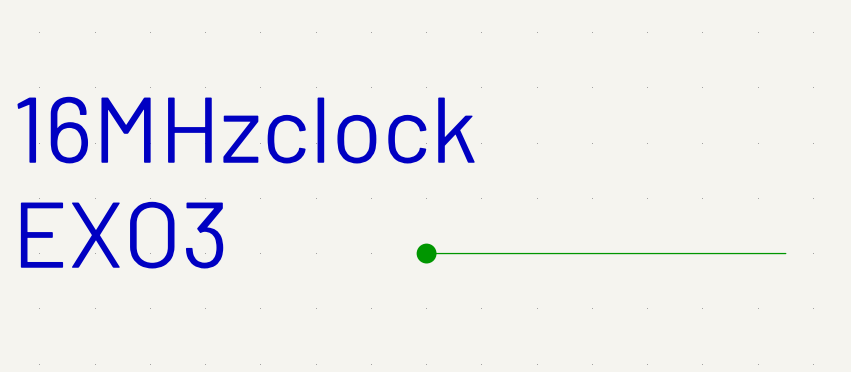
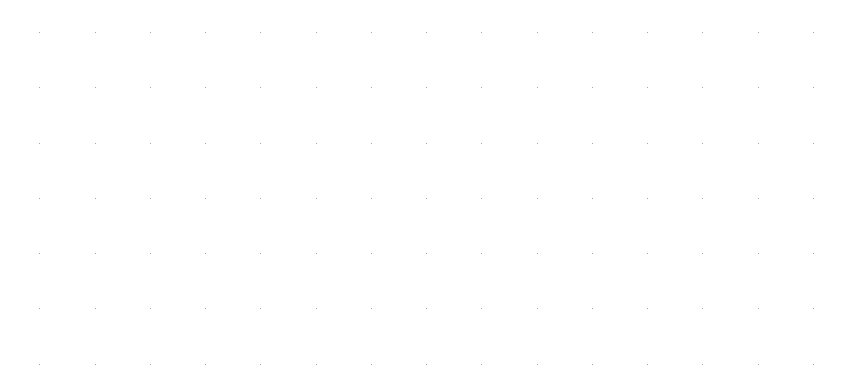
text: 16MHzclock (246, 130) -> none
text: EXO3 (122, 235) -> none
wire: (426, 253) (785, 253) -> none
junction: (426, 253) -> none

